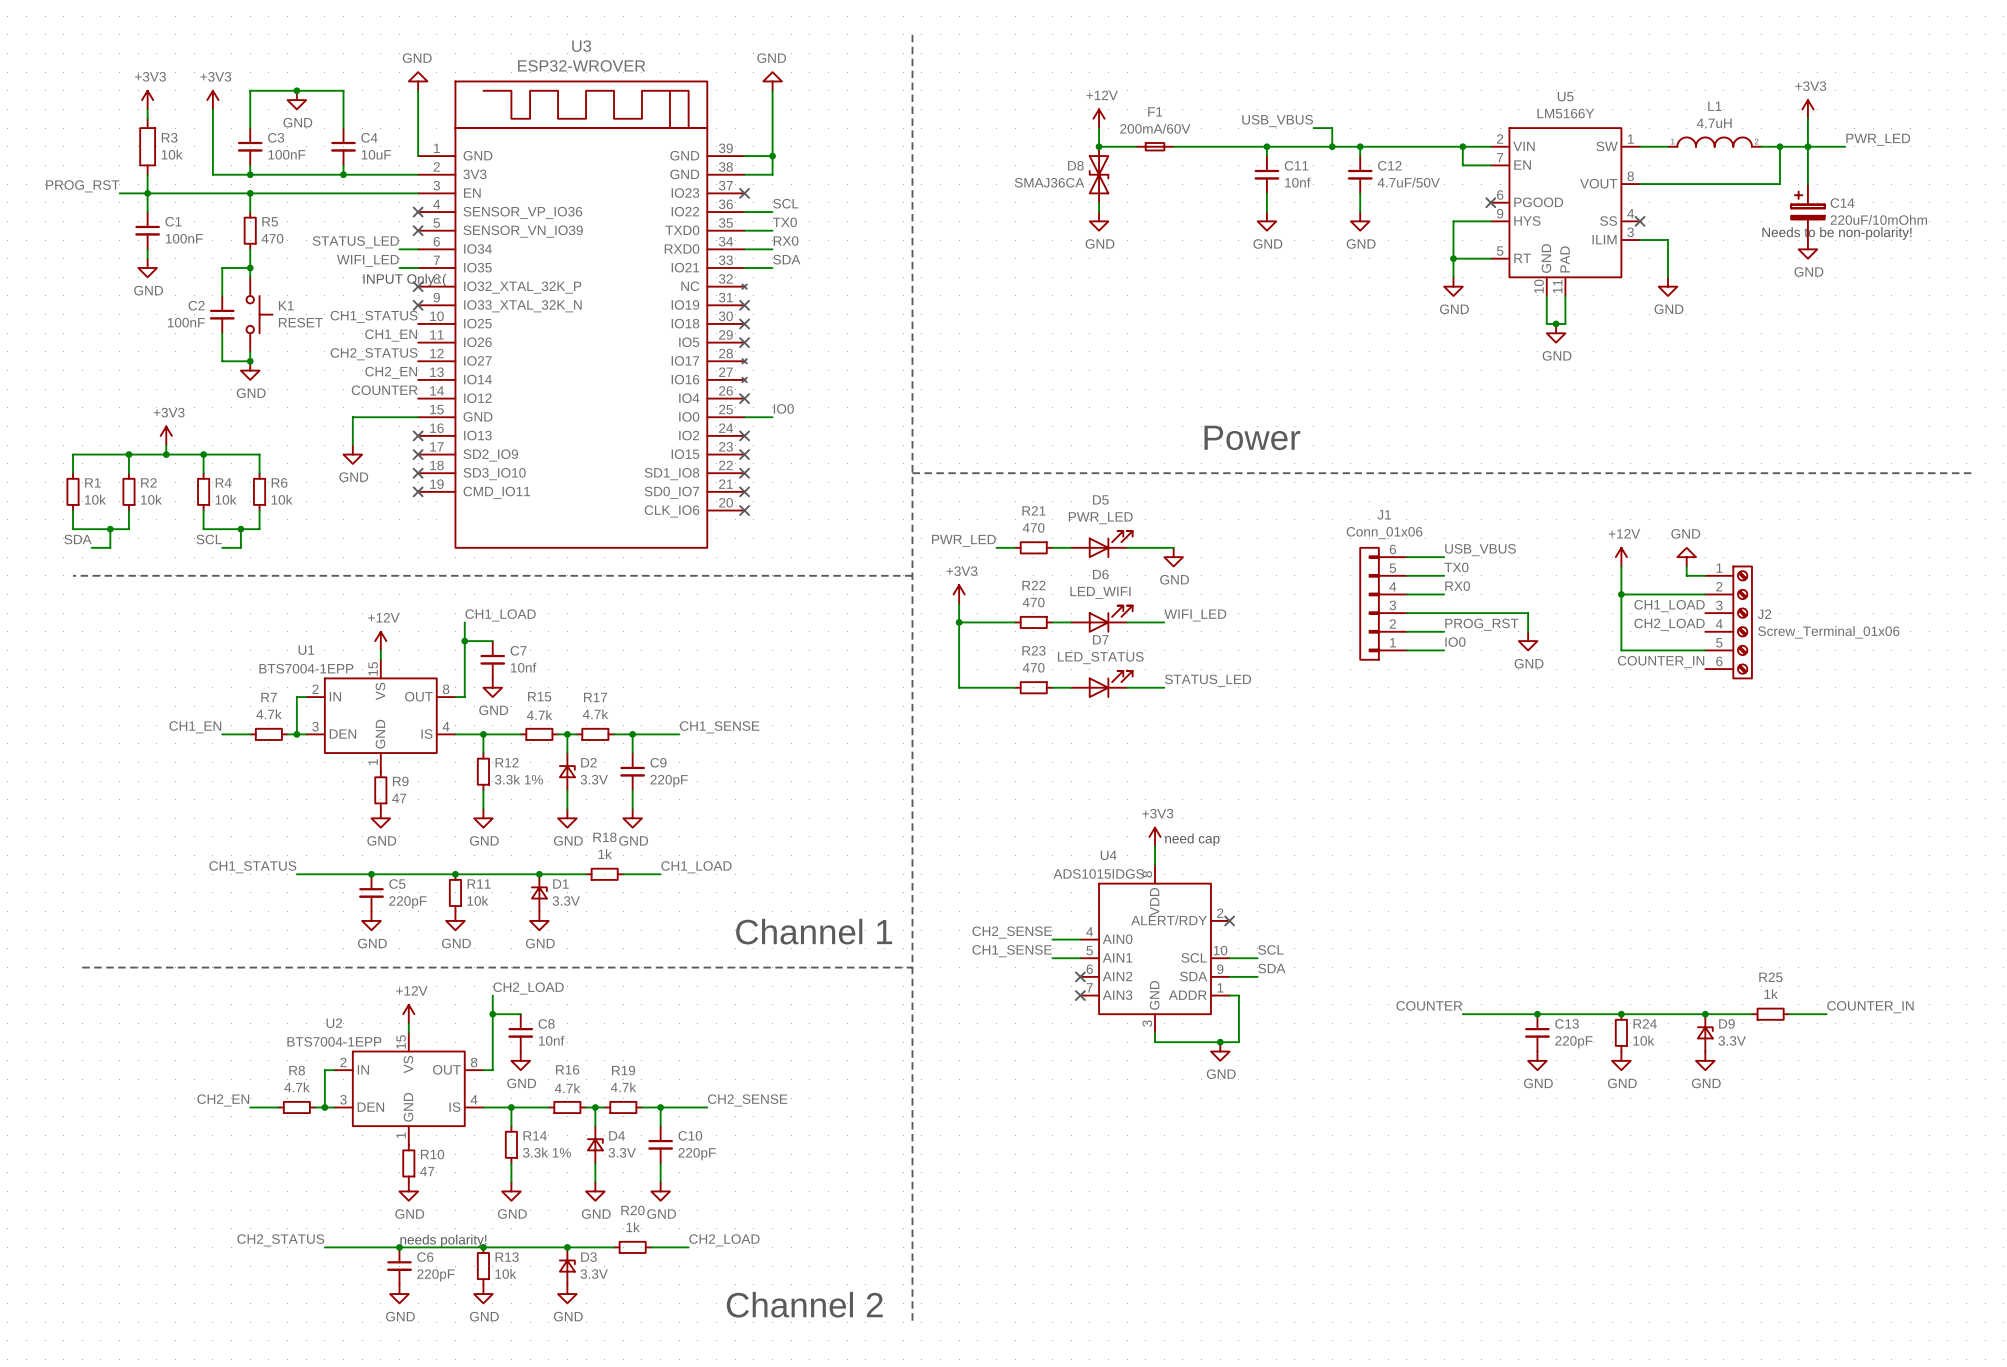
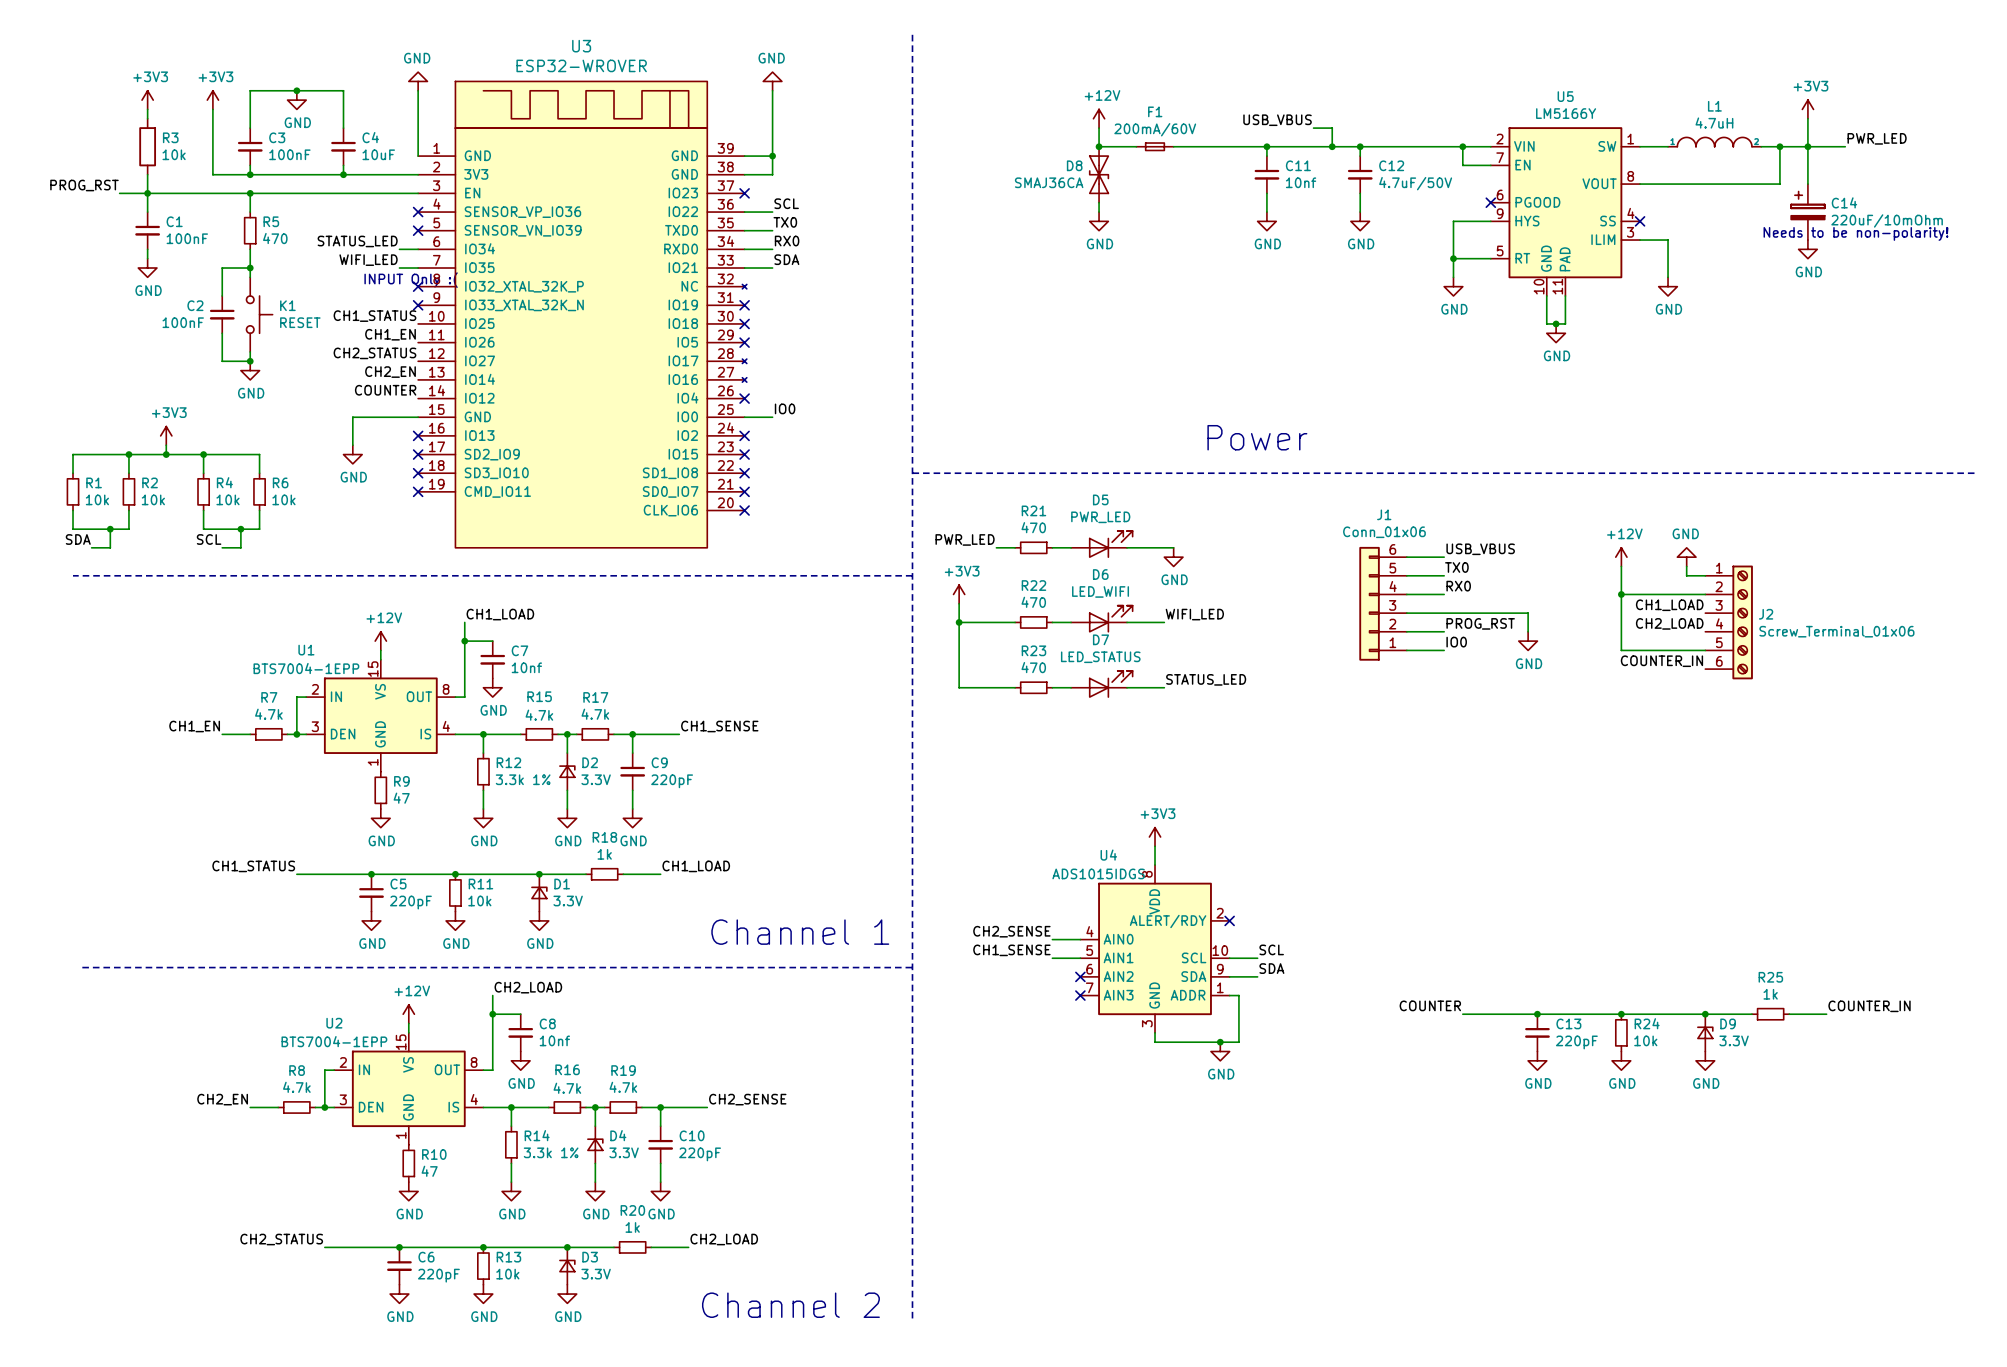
text: need cap (1192, 839) -> none
text: needs polarity! (443, 1240) -> none

